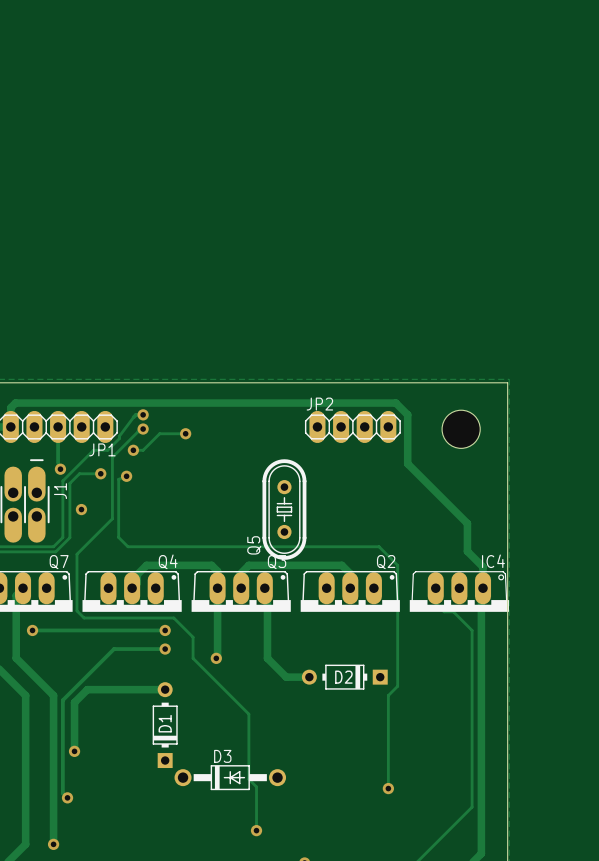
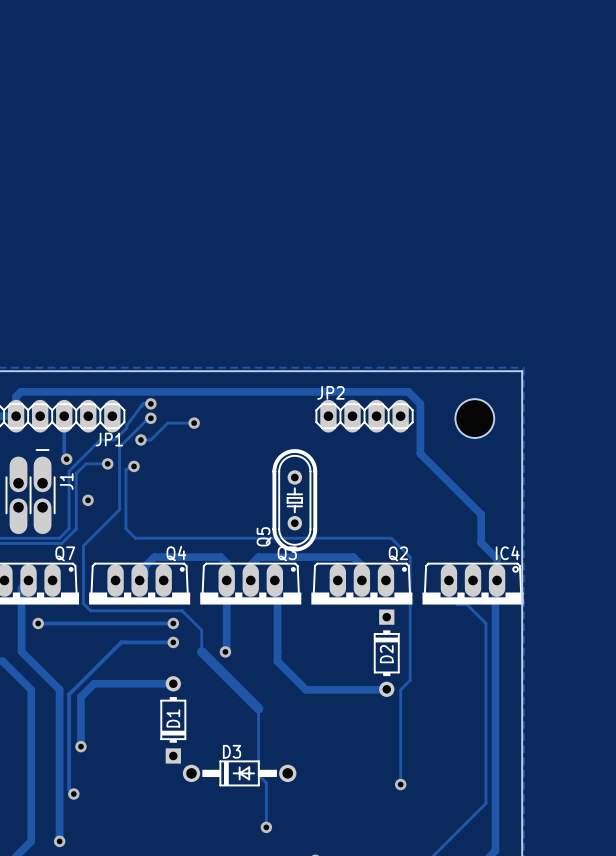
track width: thin (193, 658) (248, 714) -> thick (201, 651) (258, 708)
track: (267, 658) (286, 677) (309, 677) -> (277, 651) (277, 661) (305, 689) (386, 689)
D2 rotation: 0° (344, 677) -> 90° counterclockwise (386, 653)

